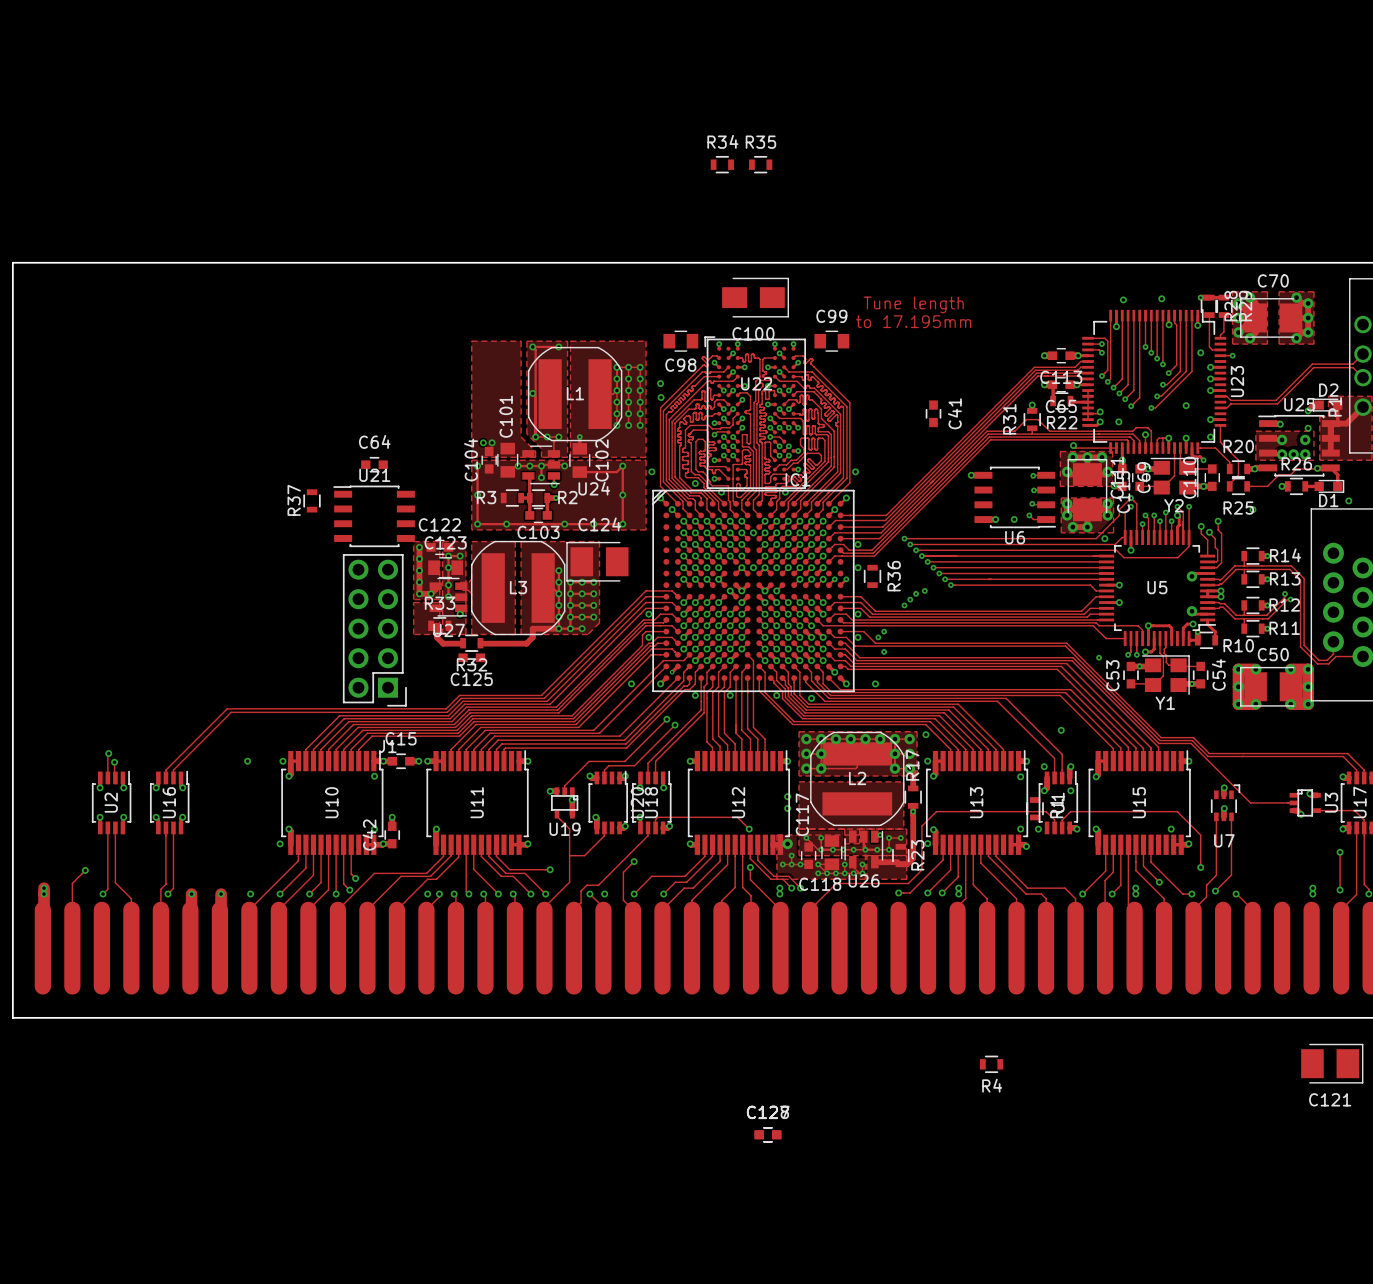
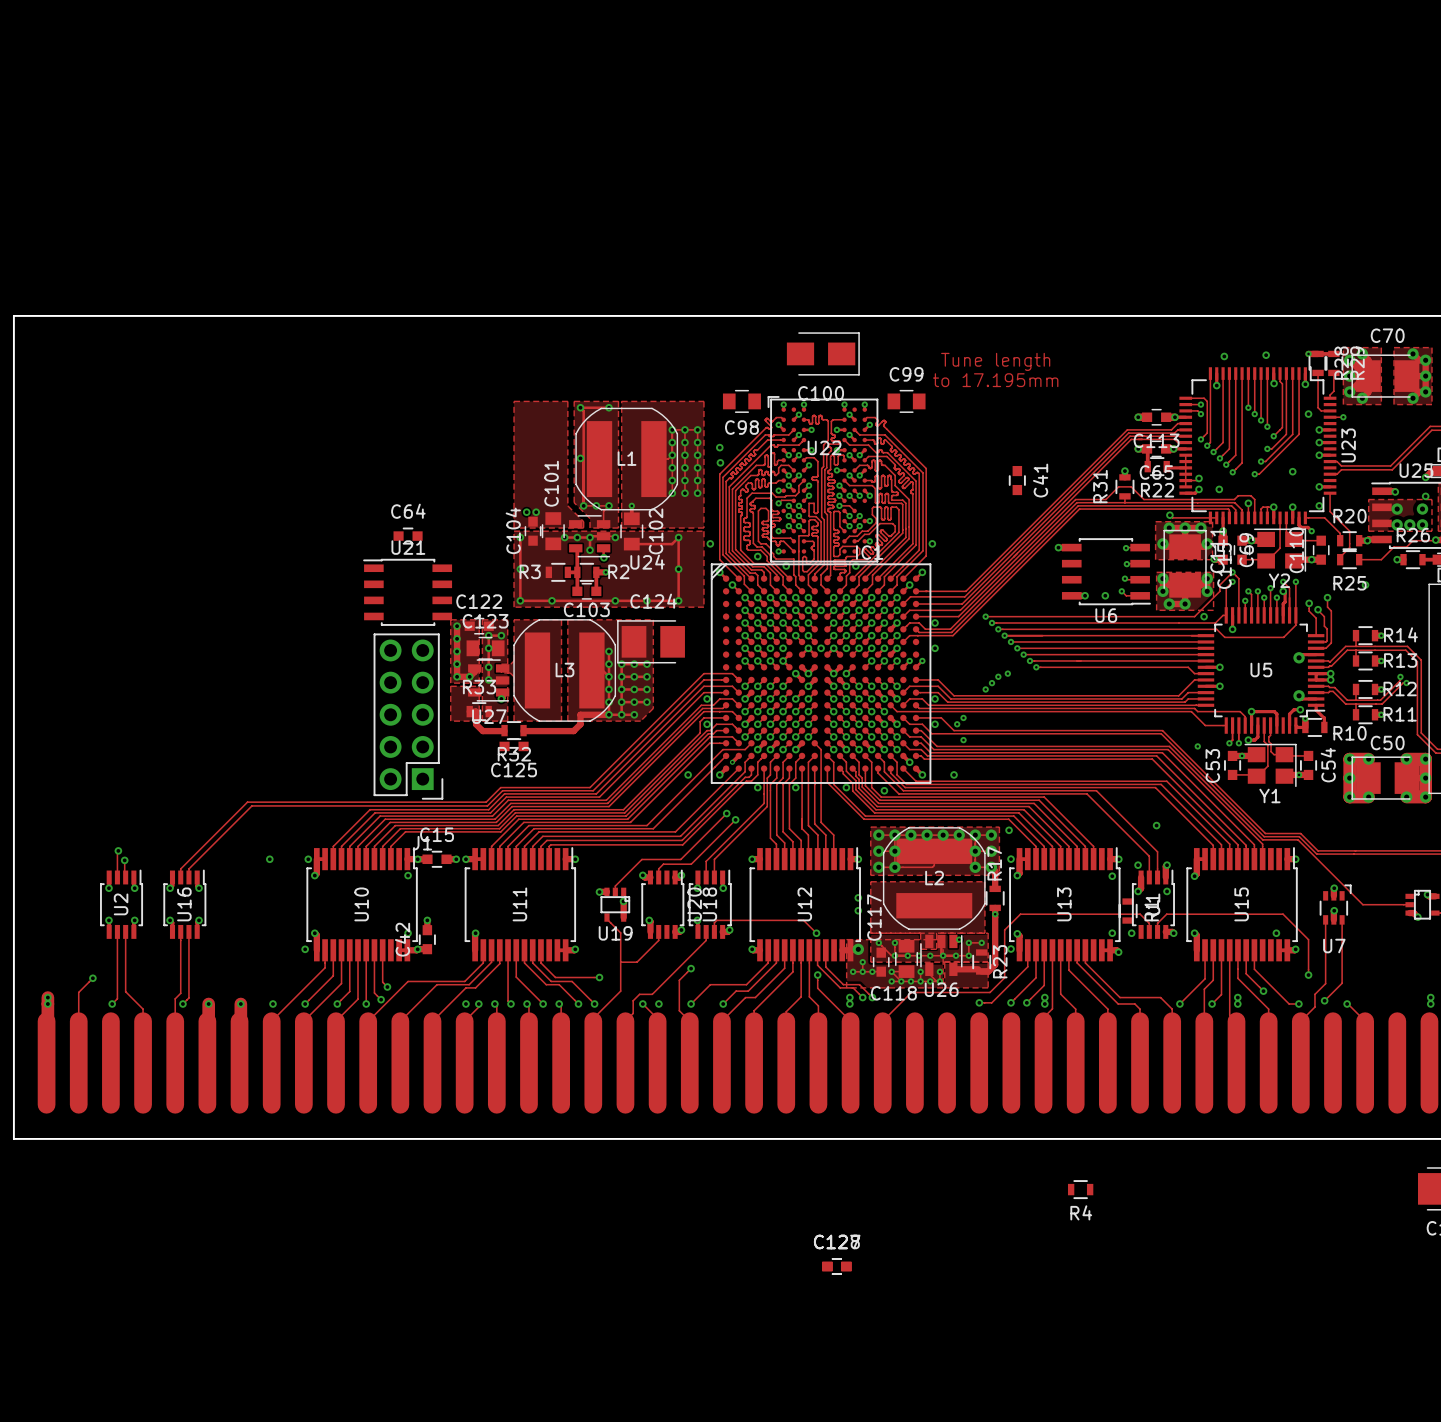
R34: (722, 164) -> none
R35: (760, 164) -> none
R37: (312, 500) -> none
R36: (872, 576) -> none

